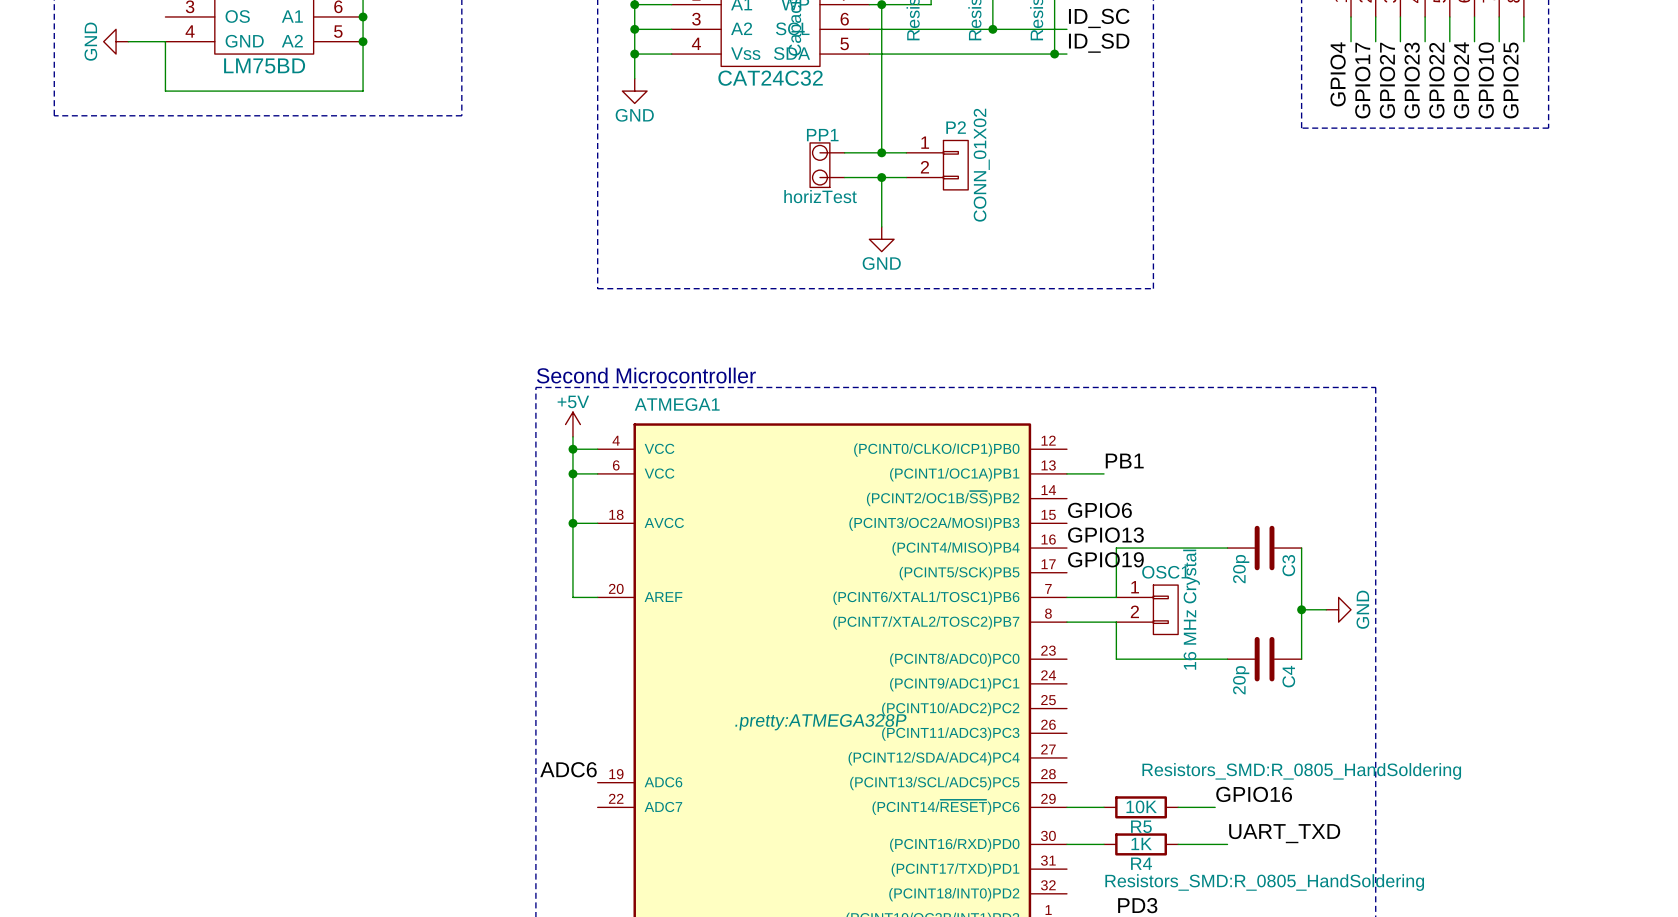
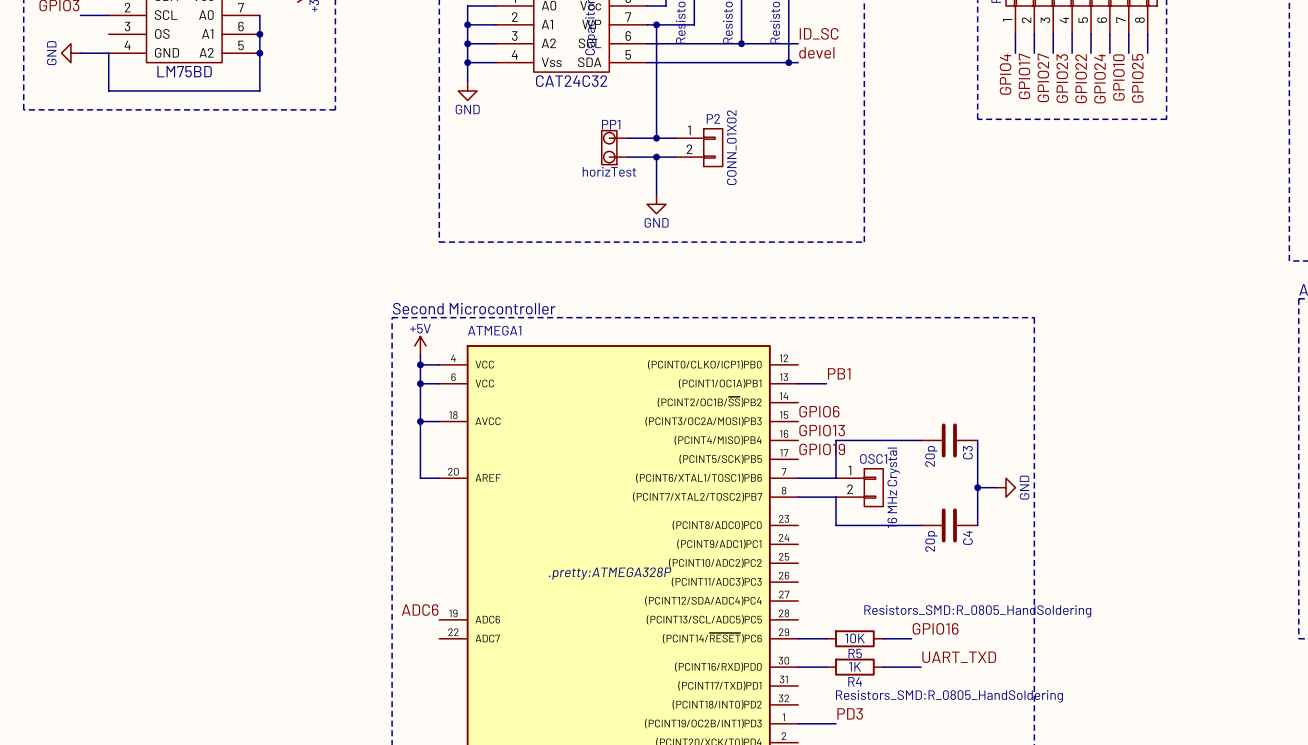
label: ID_SD (1099, 43) -> devel (816, 52)

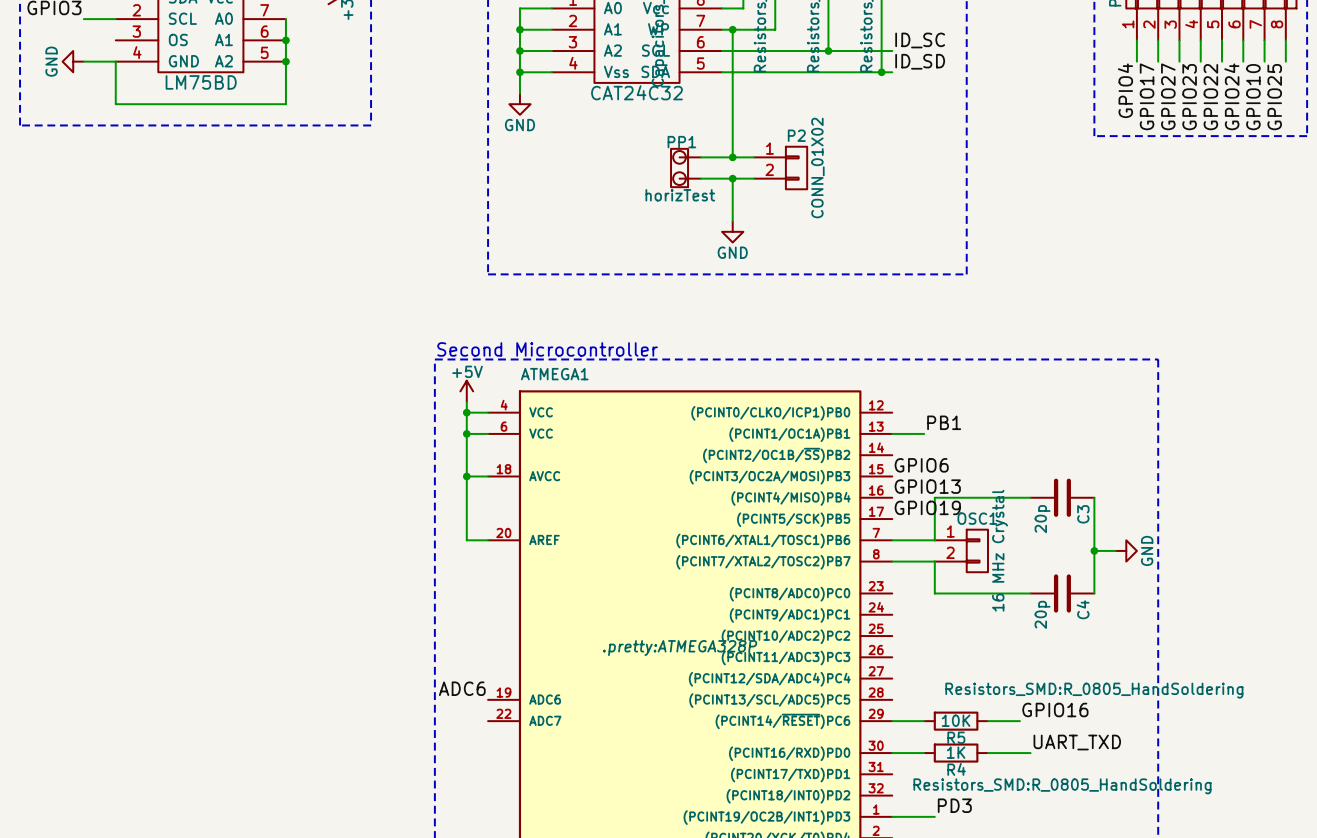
label: devel (816, 52) -> ID_SD (920, 61)

